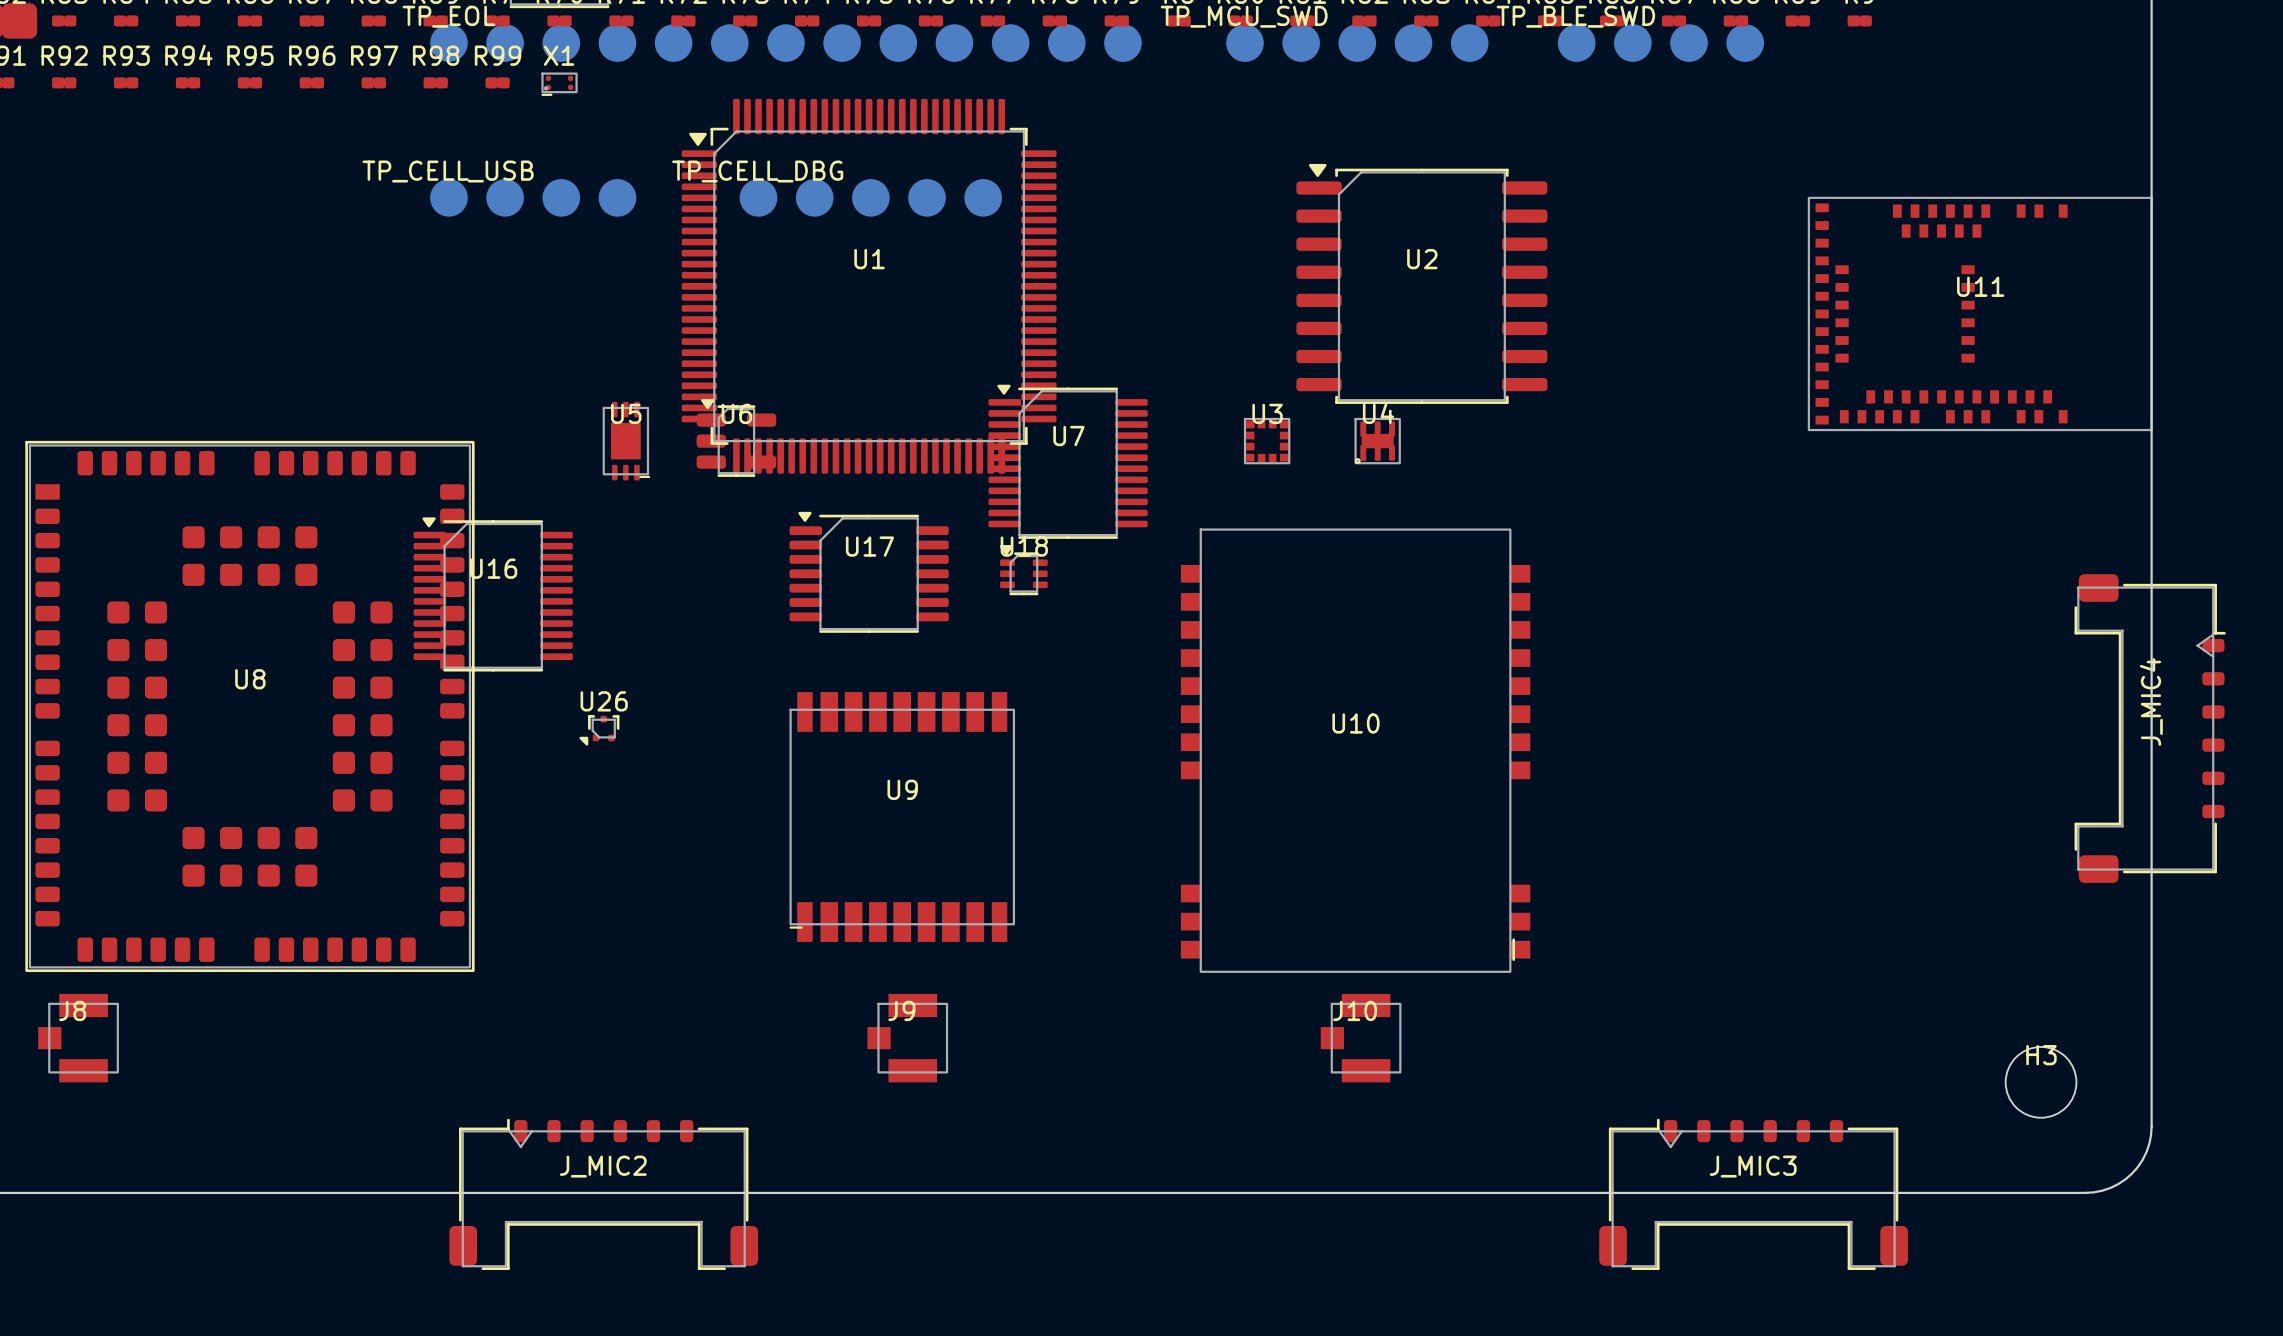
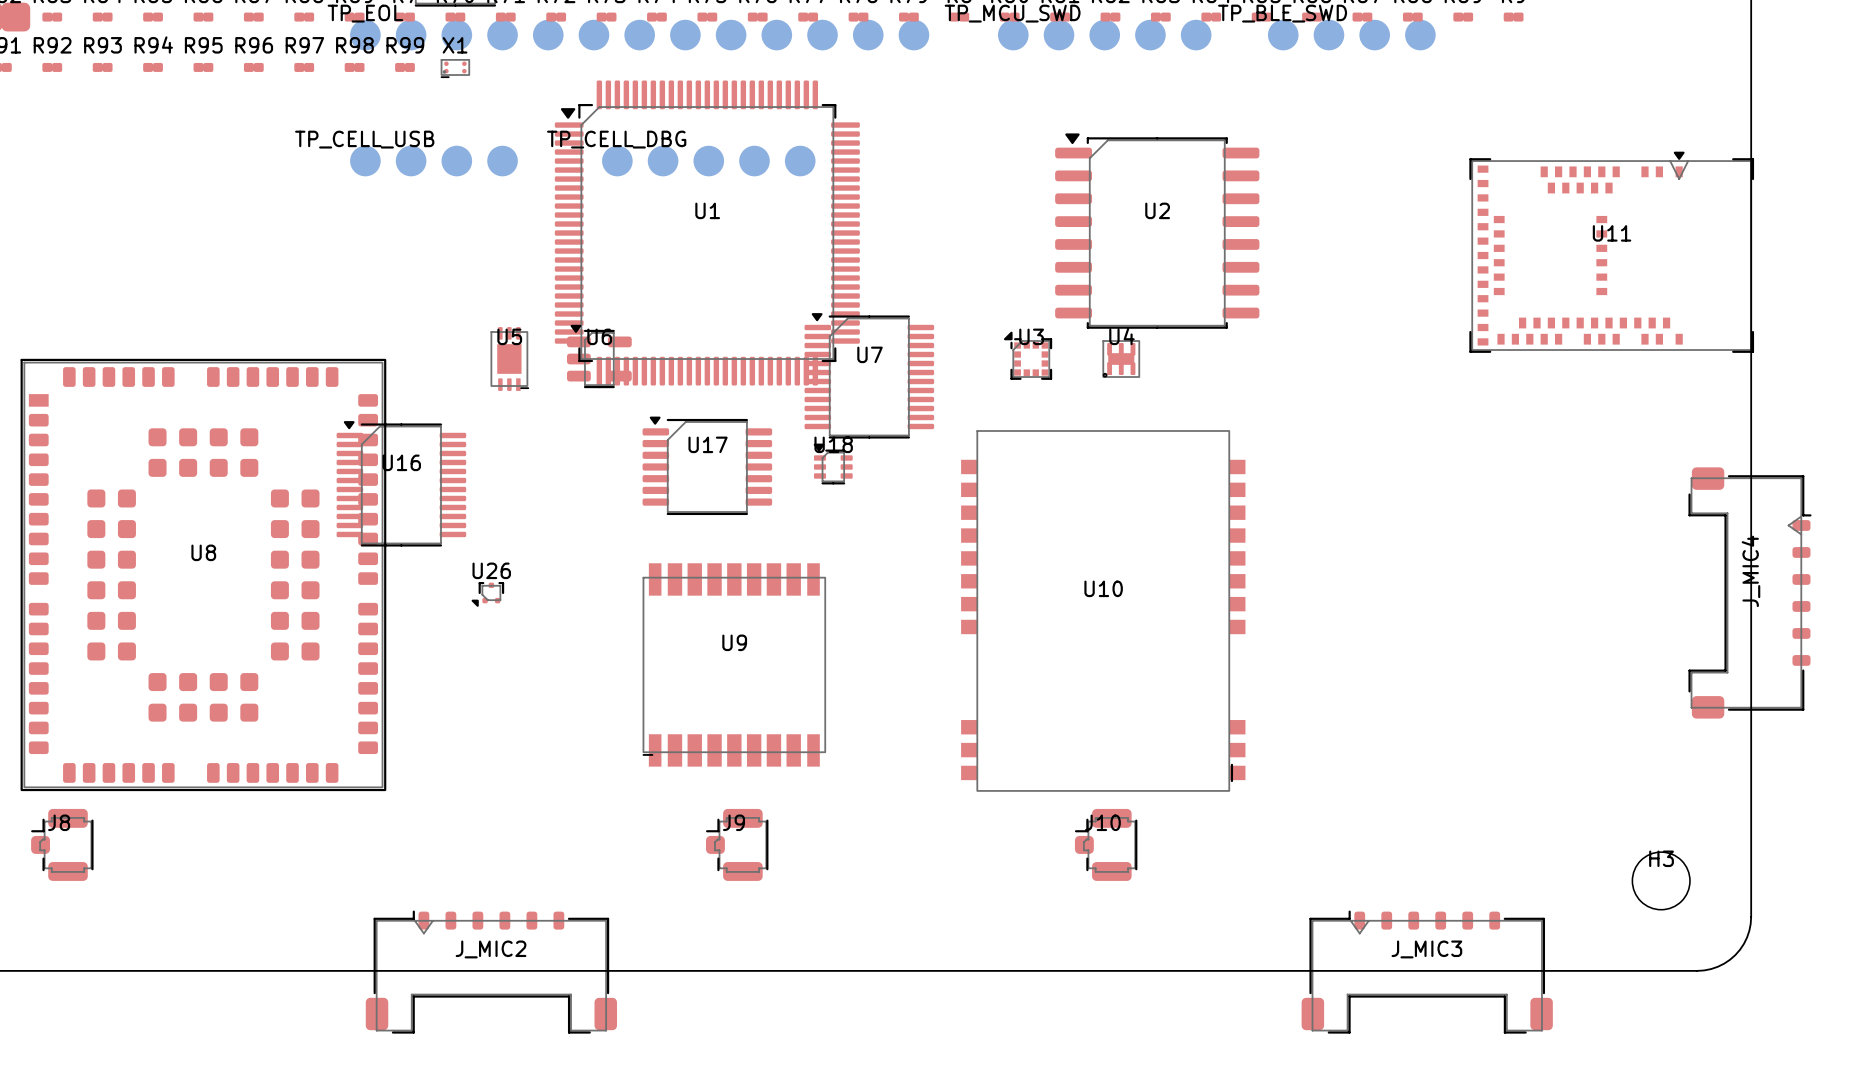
U11 footprint: [1807, 196, 2153, 432] -> [1469, 151, 1755, 353]
U3 footprint: [1243, 417, 1291, 465] -> [1003, 331, 1053, 380]
J8 footprint: [38, 993, 119, 1083] -> [31, 808, 94, 881]
J9 footprint: [867, 993, 949, 1083] -> [705, 808, 769, 881]
J10 footprint: [1320, 993, 1402, 1083] -> [1074, 808, 1138, 881]

